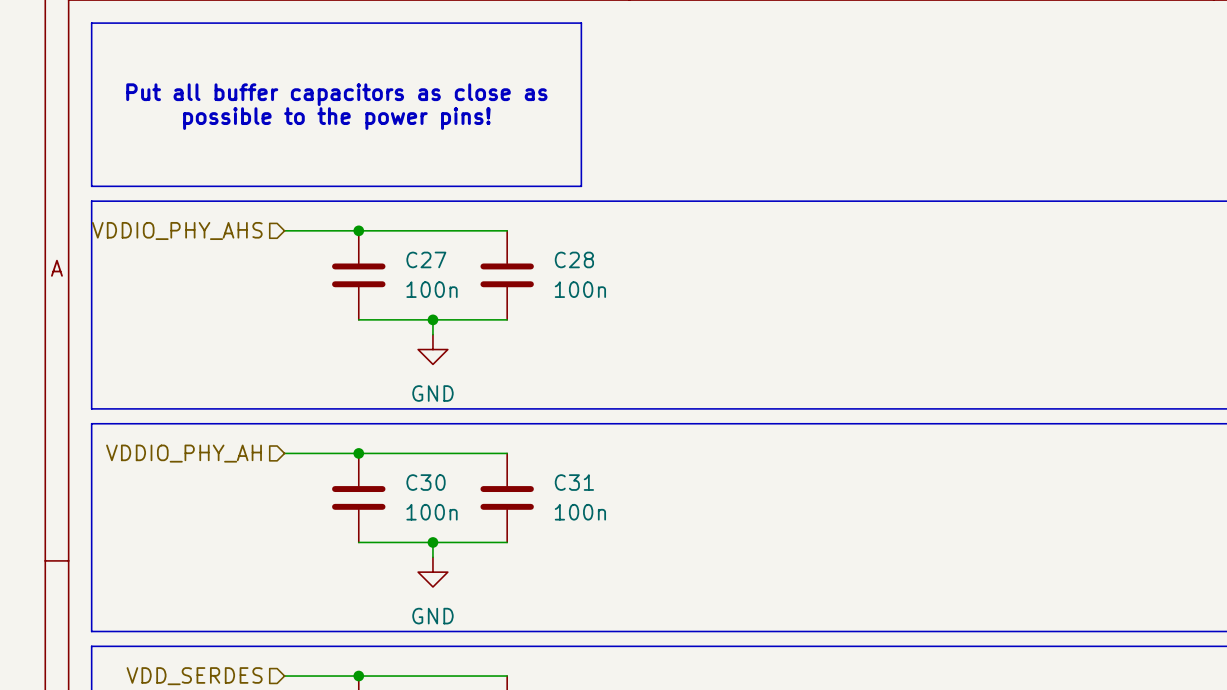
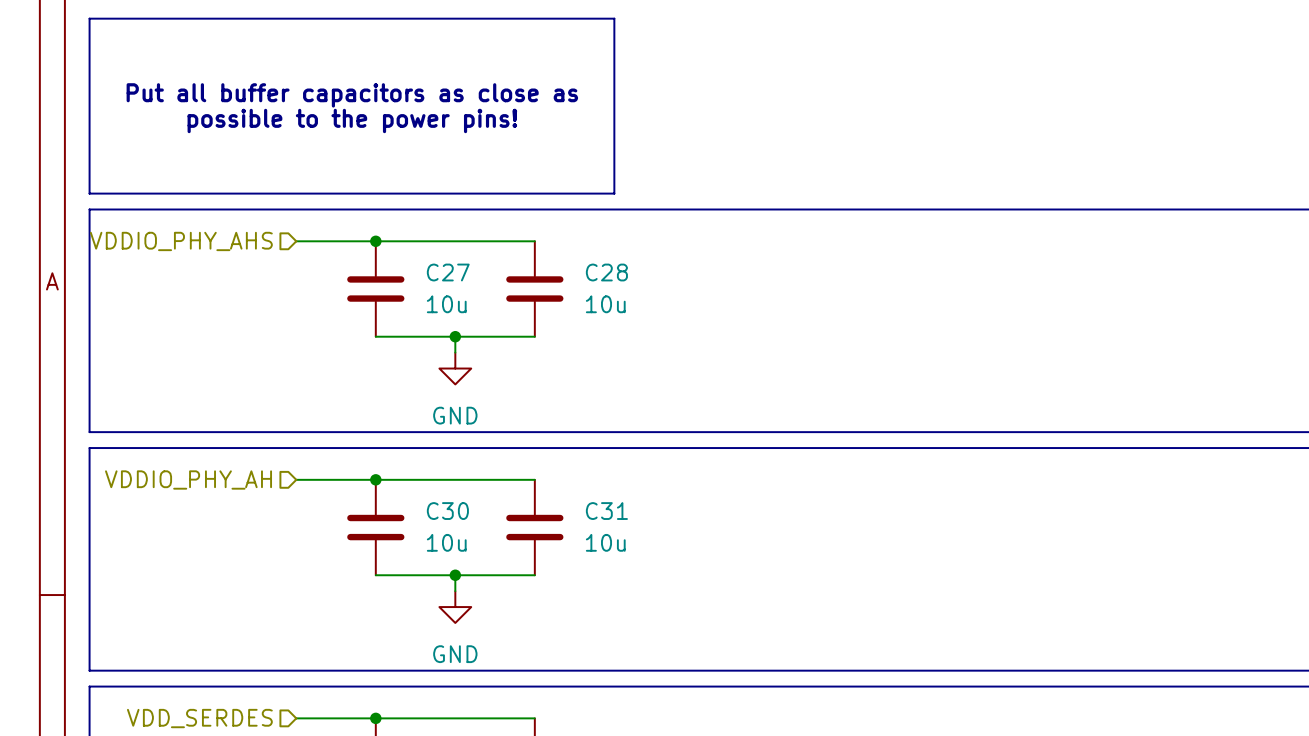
C27 value: 100n (432, 289) -> 10u (446, 304)
C28 value: 100n (580, 289) -> 10u (605, 304)
C30 value: 100n (432, 512) -> 10u (446, 542)
C31 value: 100n (580, 512) -> 10u (605, 542)

